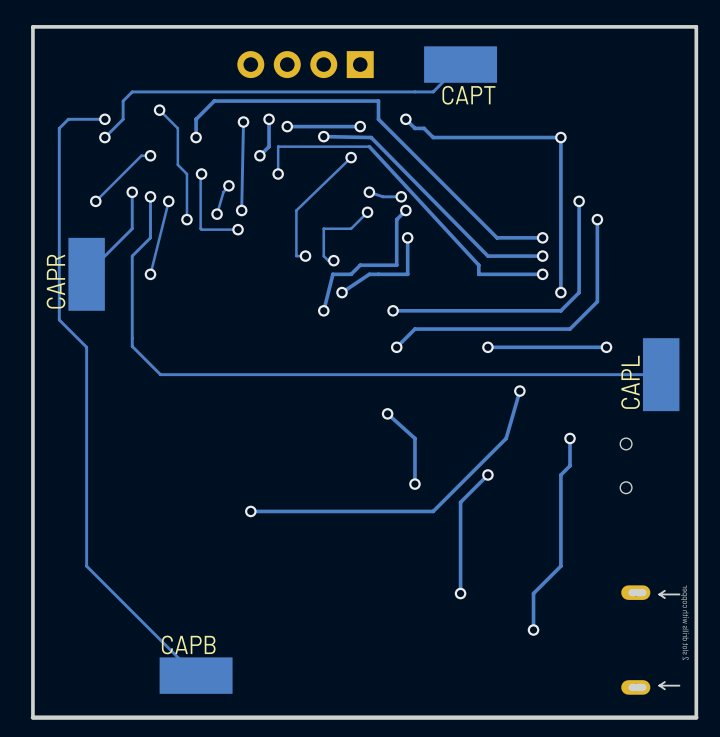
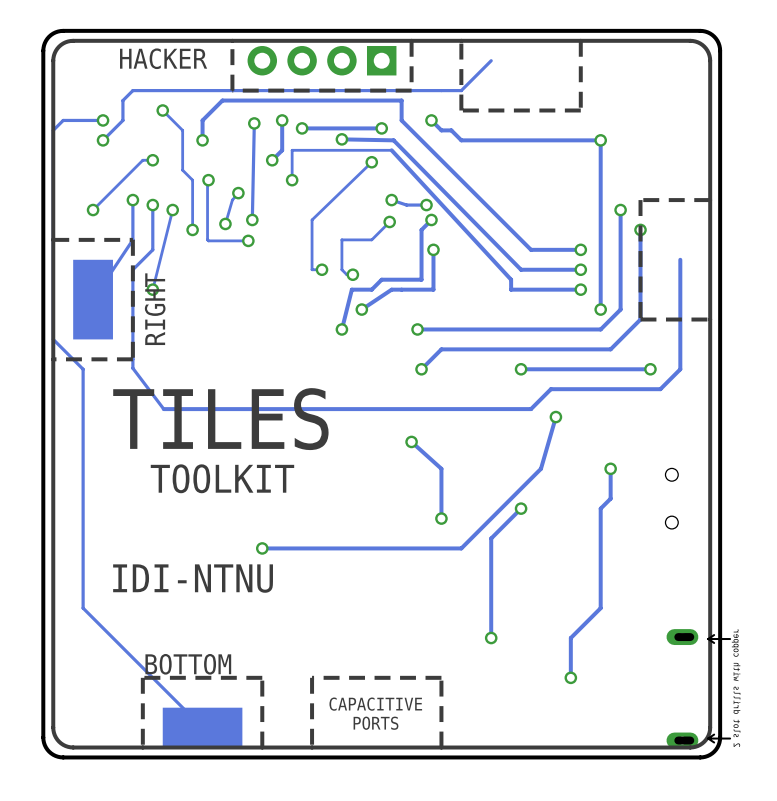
board edge: (696, 26) (696, 717) (32, 717) (32, 26) (696, 26) -> (700, 30) (707, 32) (714, 36) (718, 43) (720, 50) (720, 737) (718, 745) (714, 751) (707, 755) (700, 757) (63, 757) (55, 755) (49, 751) (44, 745) (43, 737) (43, 50) (44, 43) (49, 36) (55, 32) (63, 30) (700, 30)
line: none -> (411, 40) (411, 90) (232, 90) (232, 40)
line: none -> (580, 40) (580, 110) (461, 110) (461, 40)
line: none -> (690, 40) (73, 40) (65, 42) (59, 46) (54, 53) (53, 60) (53, 727) (54, 735) (59, 741) (65, 745) (73, 747) (690, 747) (697, 745) (704, 741) (708, 735) (710, 727) (710, 60) (708, 53) (704, 46) (697, 42) (690, 40)
text: none -> HACKER (163, 58)
CAPT: (460, 64) -> none
line: none -> (710, 200) (640, 200) (640, 319) (710, 319)
line: none -> (53, 239) (132, 239) (132, 359) (53, 359)
track: (132, 228) (86, 274) -> (132, 239) (93, 299)
CAPR position: (86, 274) -> (93, 299)
CAPR name: CAPR (56, 281) -> RIGHT (155, 309)
track: (132, 346) (160, 374) (661, 374) -> (132, 368) (163, 409) (531, 409) (550, 389) (660, 389) (680, 369) (680, 259)
CAPL: (661, 374) -> none
text: none -> TILES (220, 419)
text: none -> TOOLKIT (222, 478)
text: none -> IDI-NTNU (193, 578)
CAPB name: CAPB (188, 644) -> BOTTOM (188, 664)
text: none -> CAPACITIVE (375, 704)
text: none -> PORTS (375, 723)
line: none -> (262, 747) (262, 677) (142, 677) (142, 747)
line: none -> (441, 747) (441, 677) (312, 677) (312, 747)

